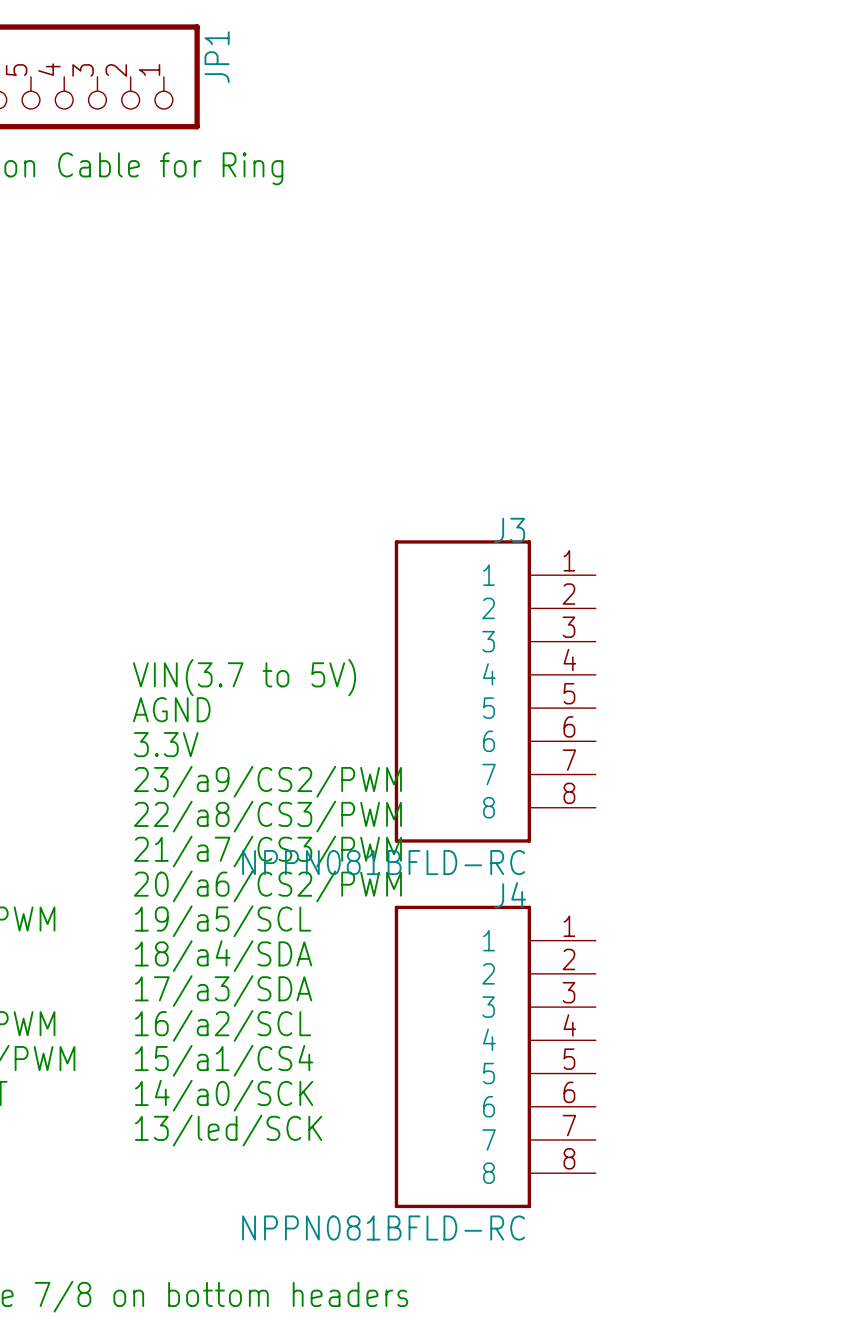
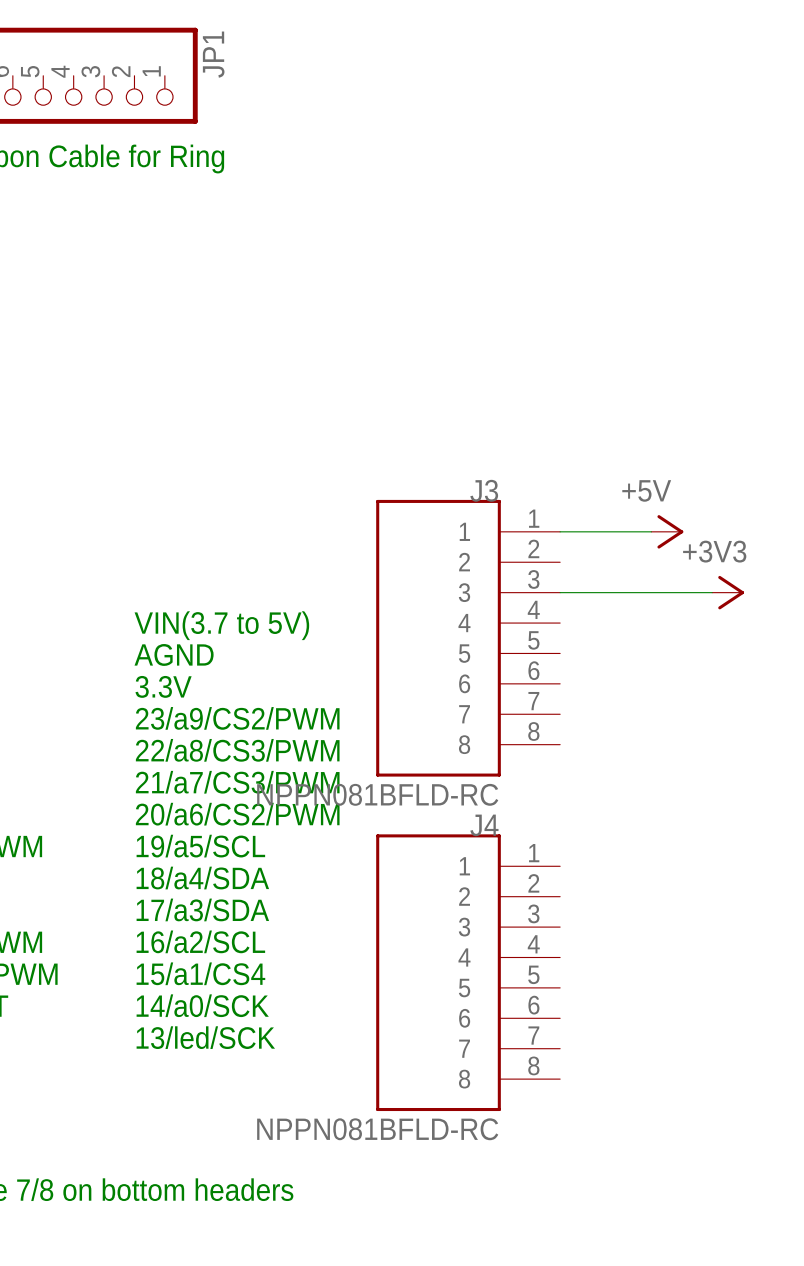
wire: none -> (560, 531) (651, 531)
power symbol: none -> +5V (667, 531)
wire: none -> (560, 592) (712, 592)
power symbol: none -> +3V3 (728, 592)

